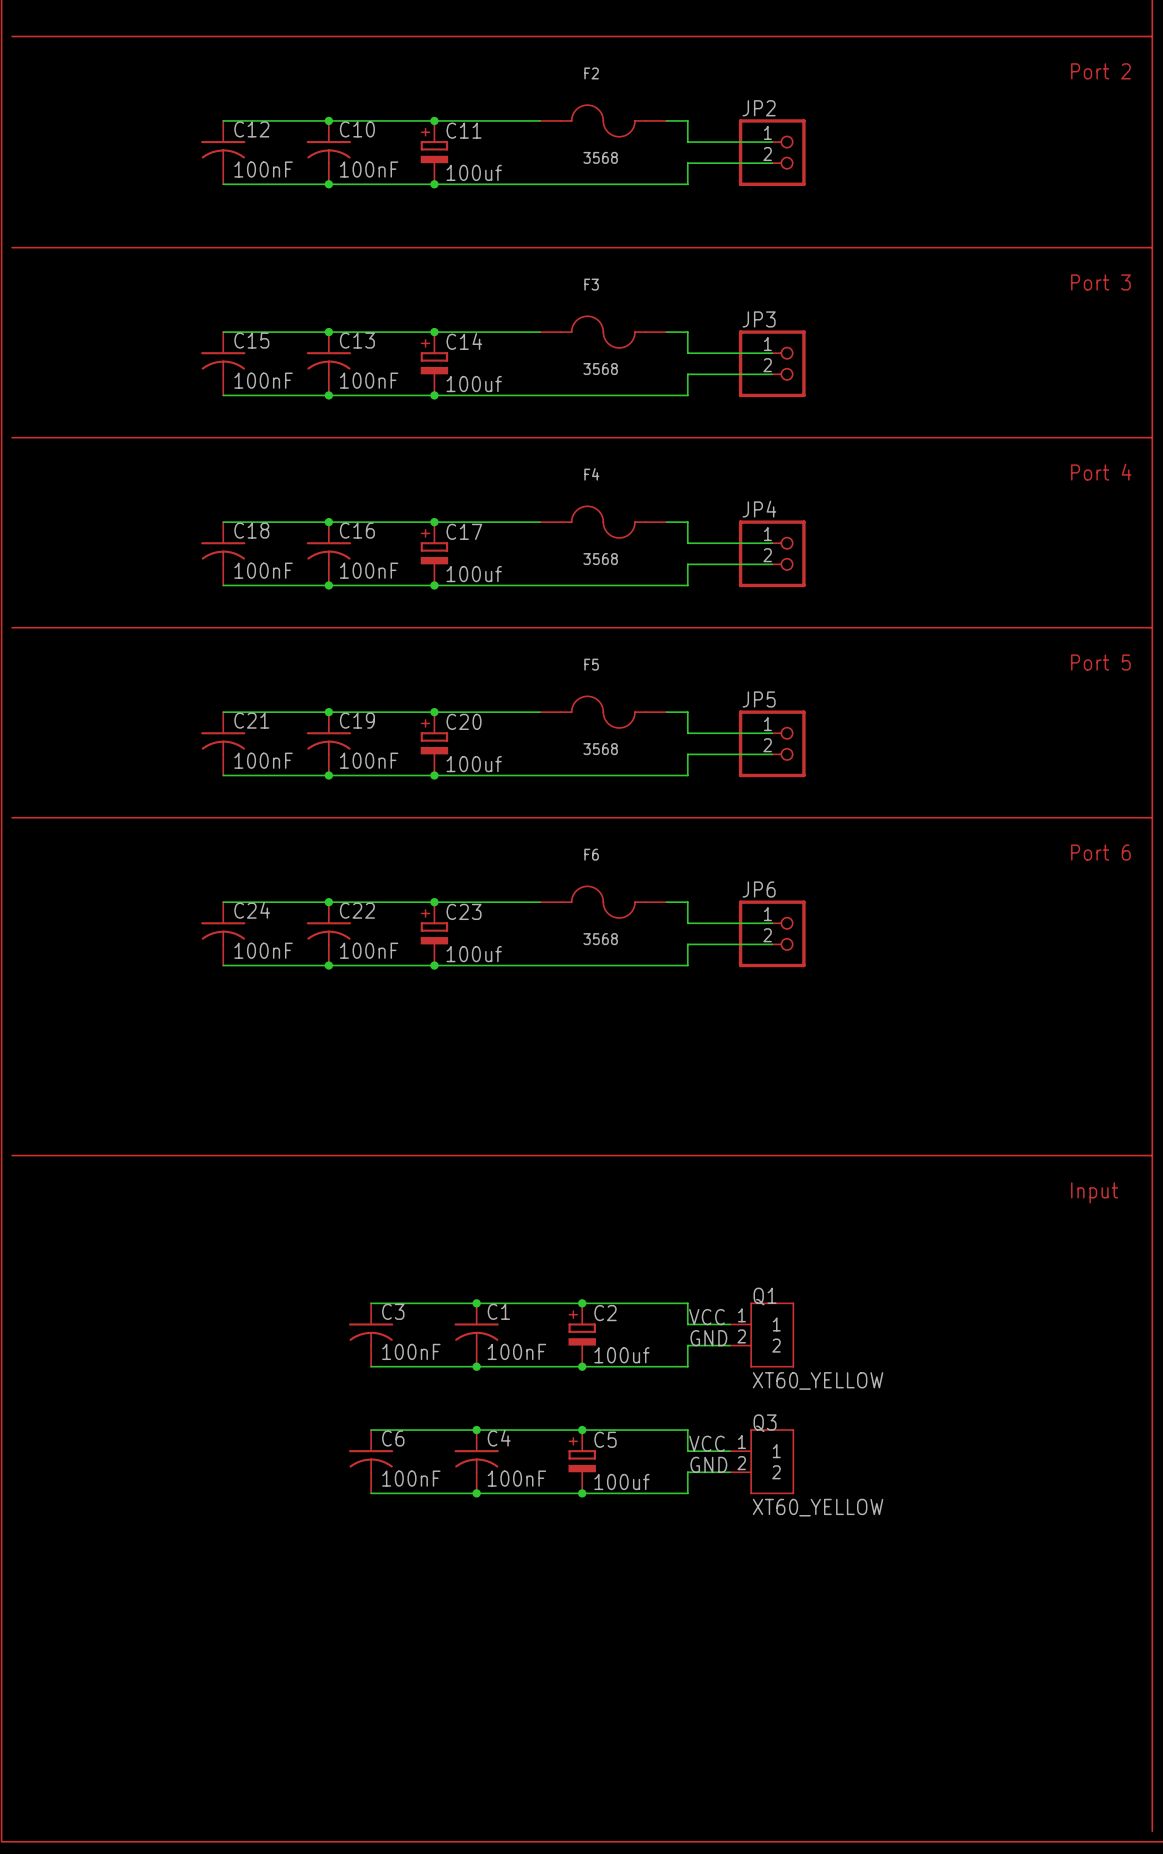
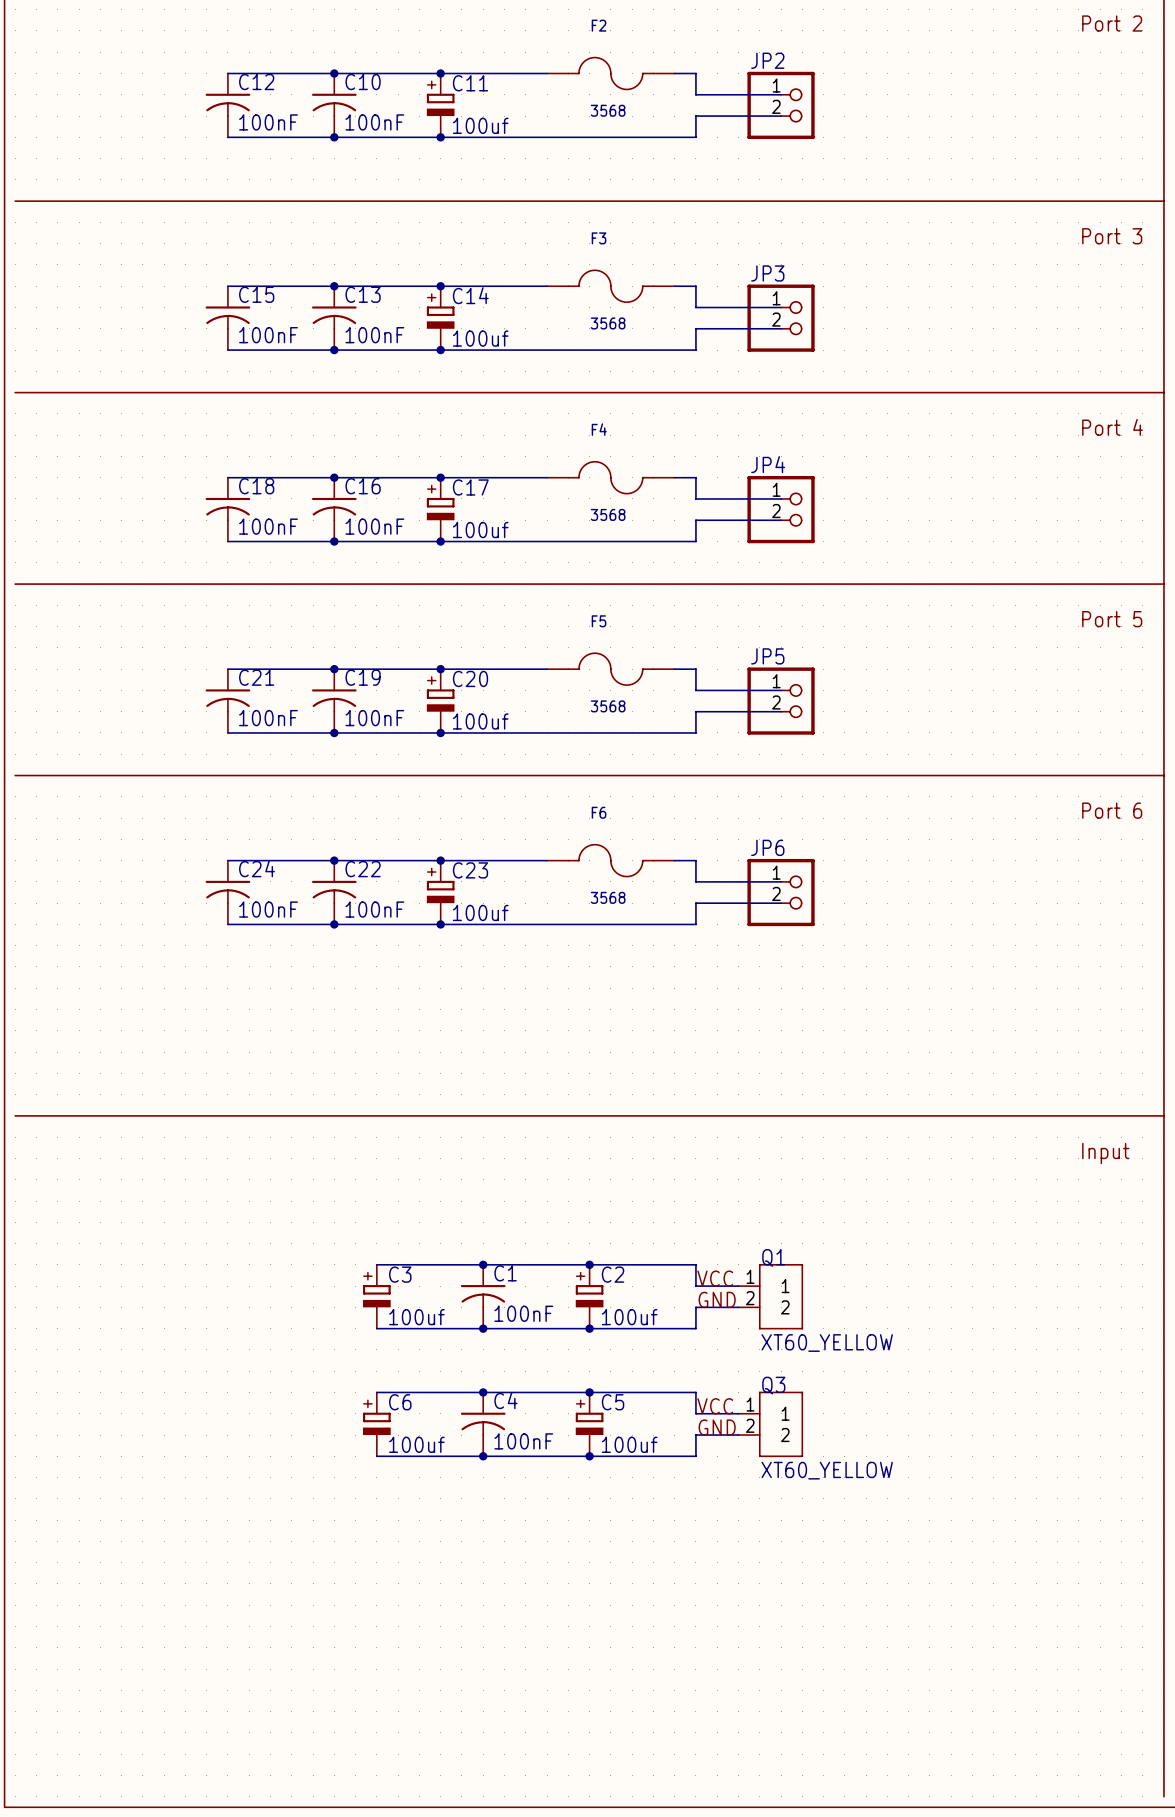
C3 symbol: [348, 1303, 394, 1367] -> [363, 1264, 391, 1329]
C3 value: 100nF (411, 1351) -> 100uf (416, 1317)
C6 symbol: [348, 1430, 394, 1494] -> [363, 1392, 391, 1457]
C6 value: 100nF (411, 1478) -> 100uf (416, 1444)

